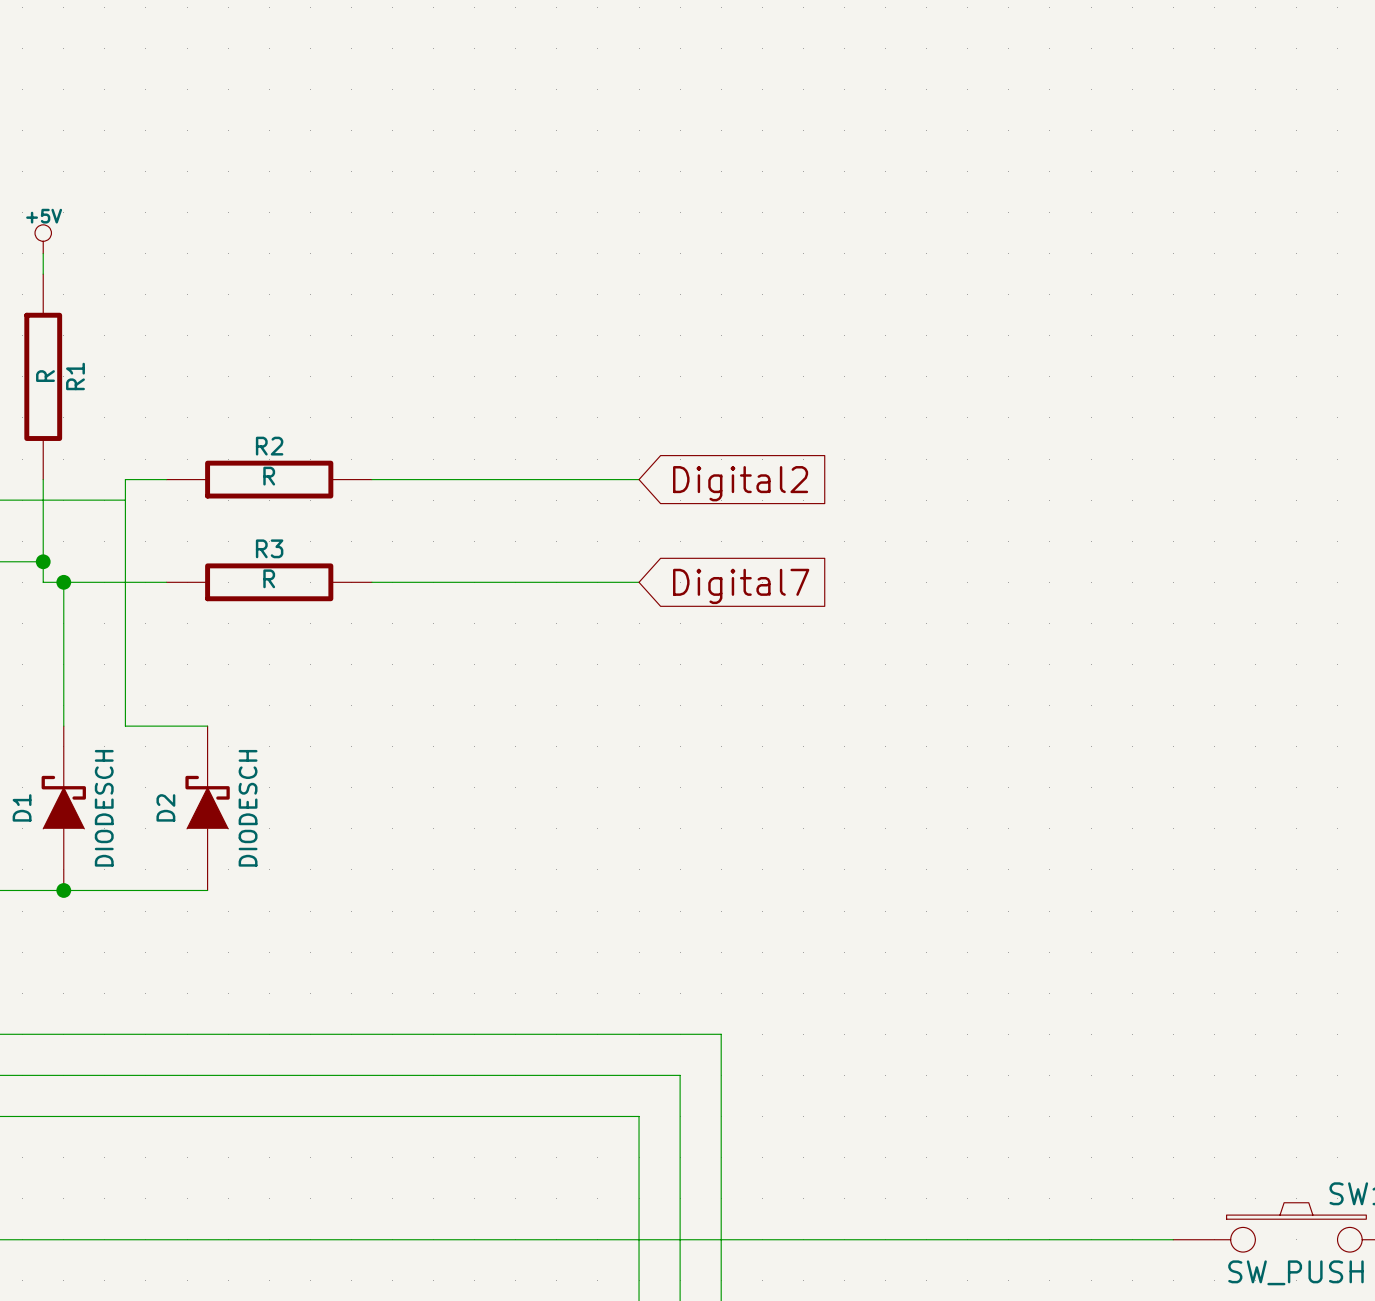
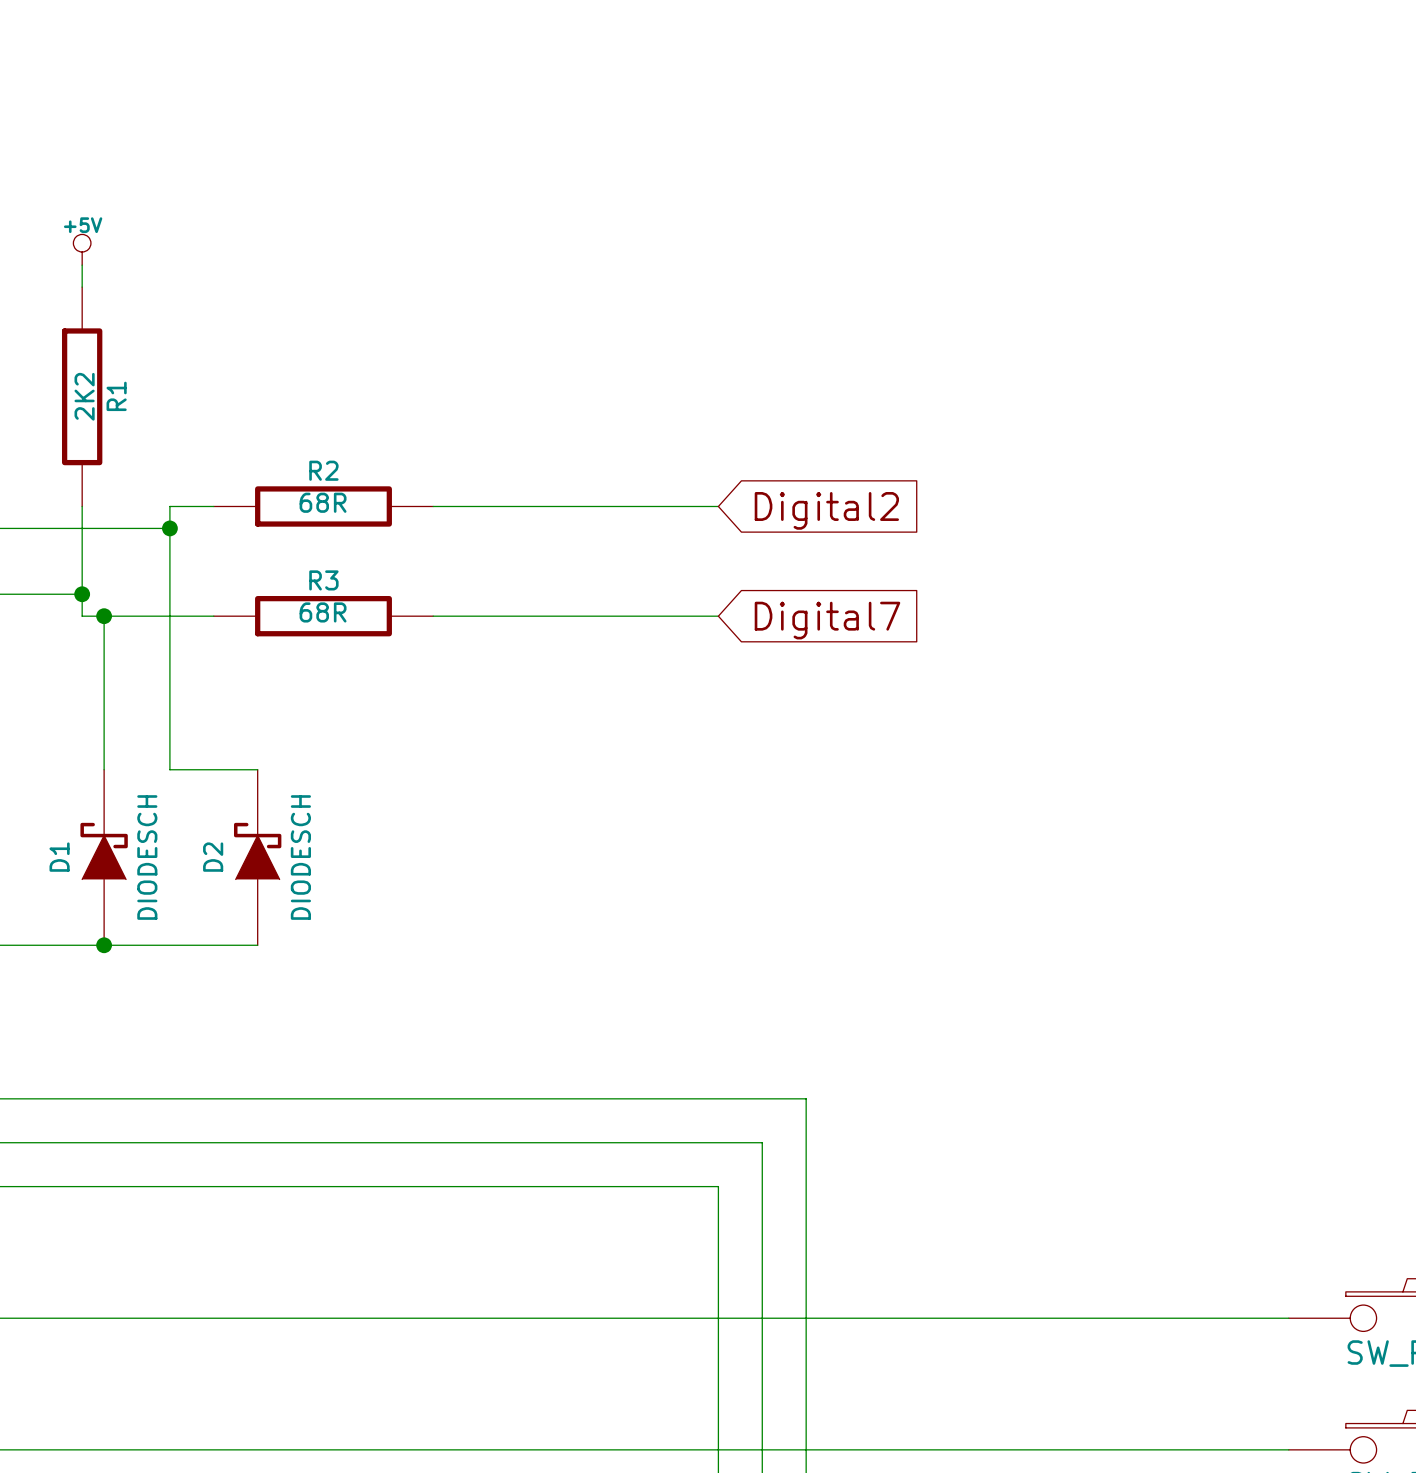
R1 value: R (45, 376) -> 2K2 (84, 396)
R2 value: R (269, 476) -> 68R (323, 502)
junction: none -> (169, 528)
R3 value: R (269, 578) -> 68R (323, 612)

